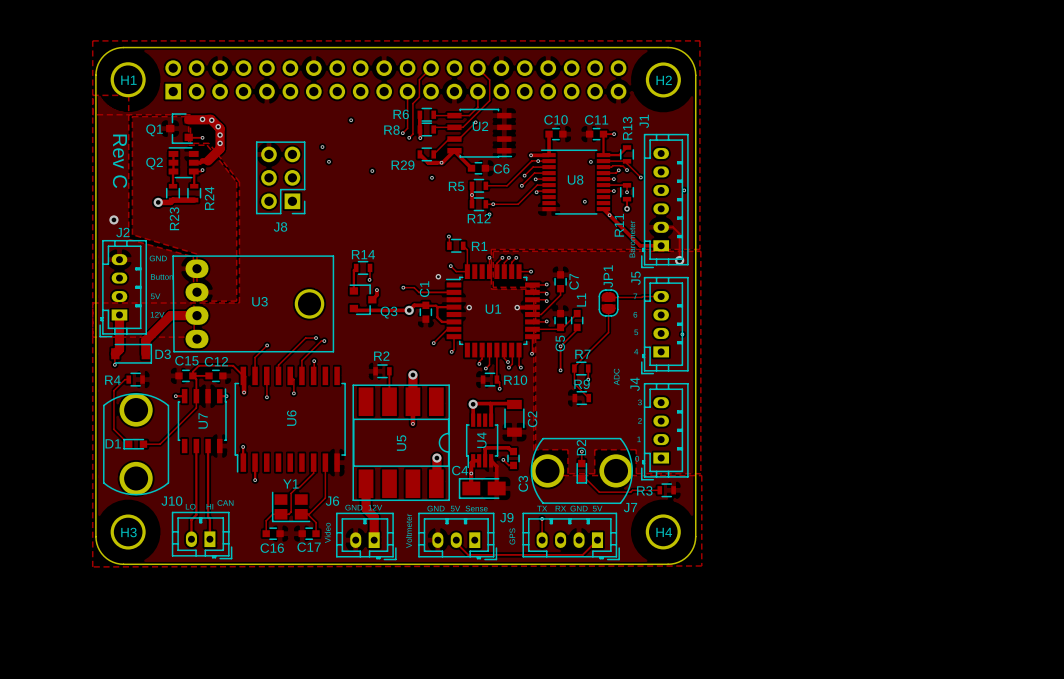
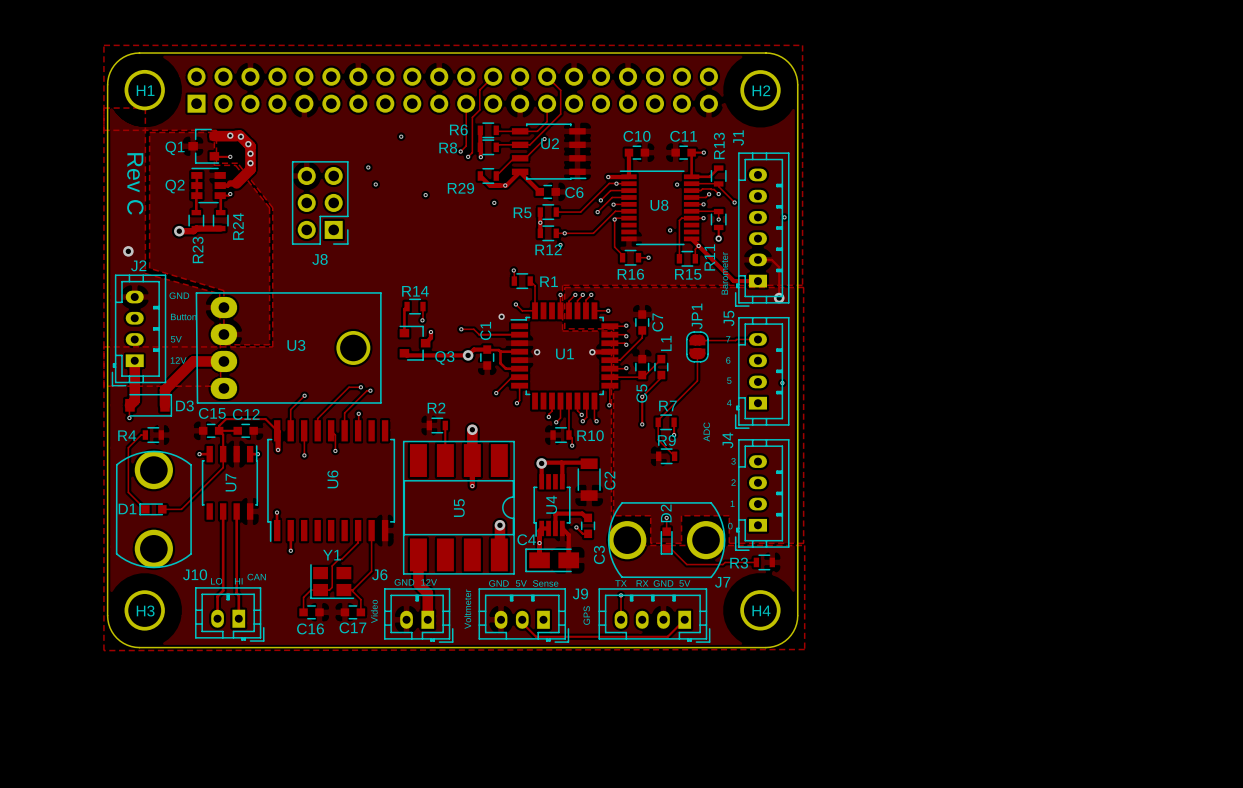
track: none -> (691, 218) (681, 218) (679, 220) (679, 258)
track: none -> (614, 219) (614, 247) (622, 255) (622, 257)
track: none -> (698, 245) (695, 249) (695, 258)
R16: none -> (630, 257)
track: none -> (638, 257) (648, 257)
via: none -> (648, 257)
R15: none -> (687, 258)

